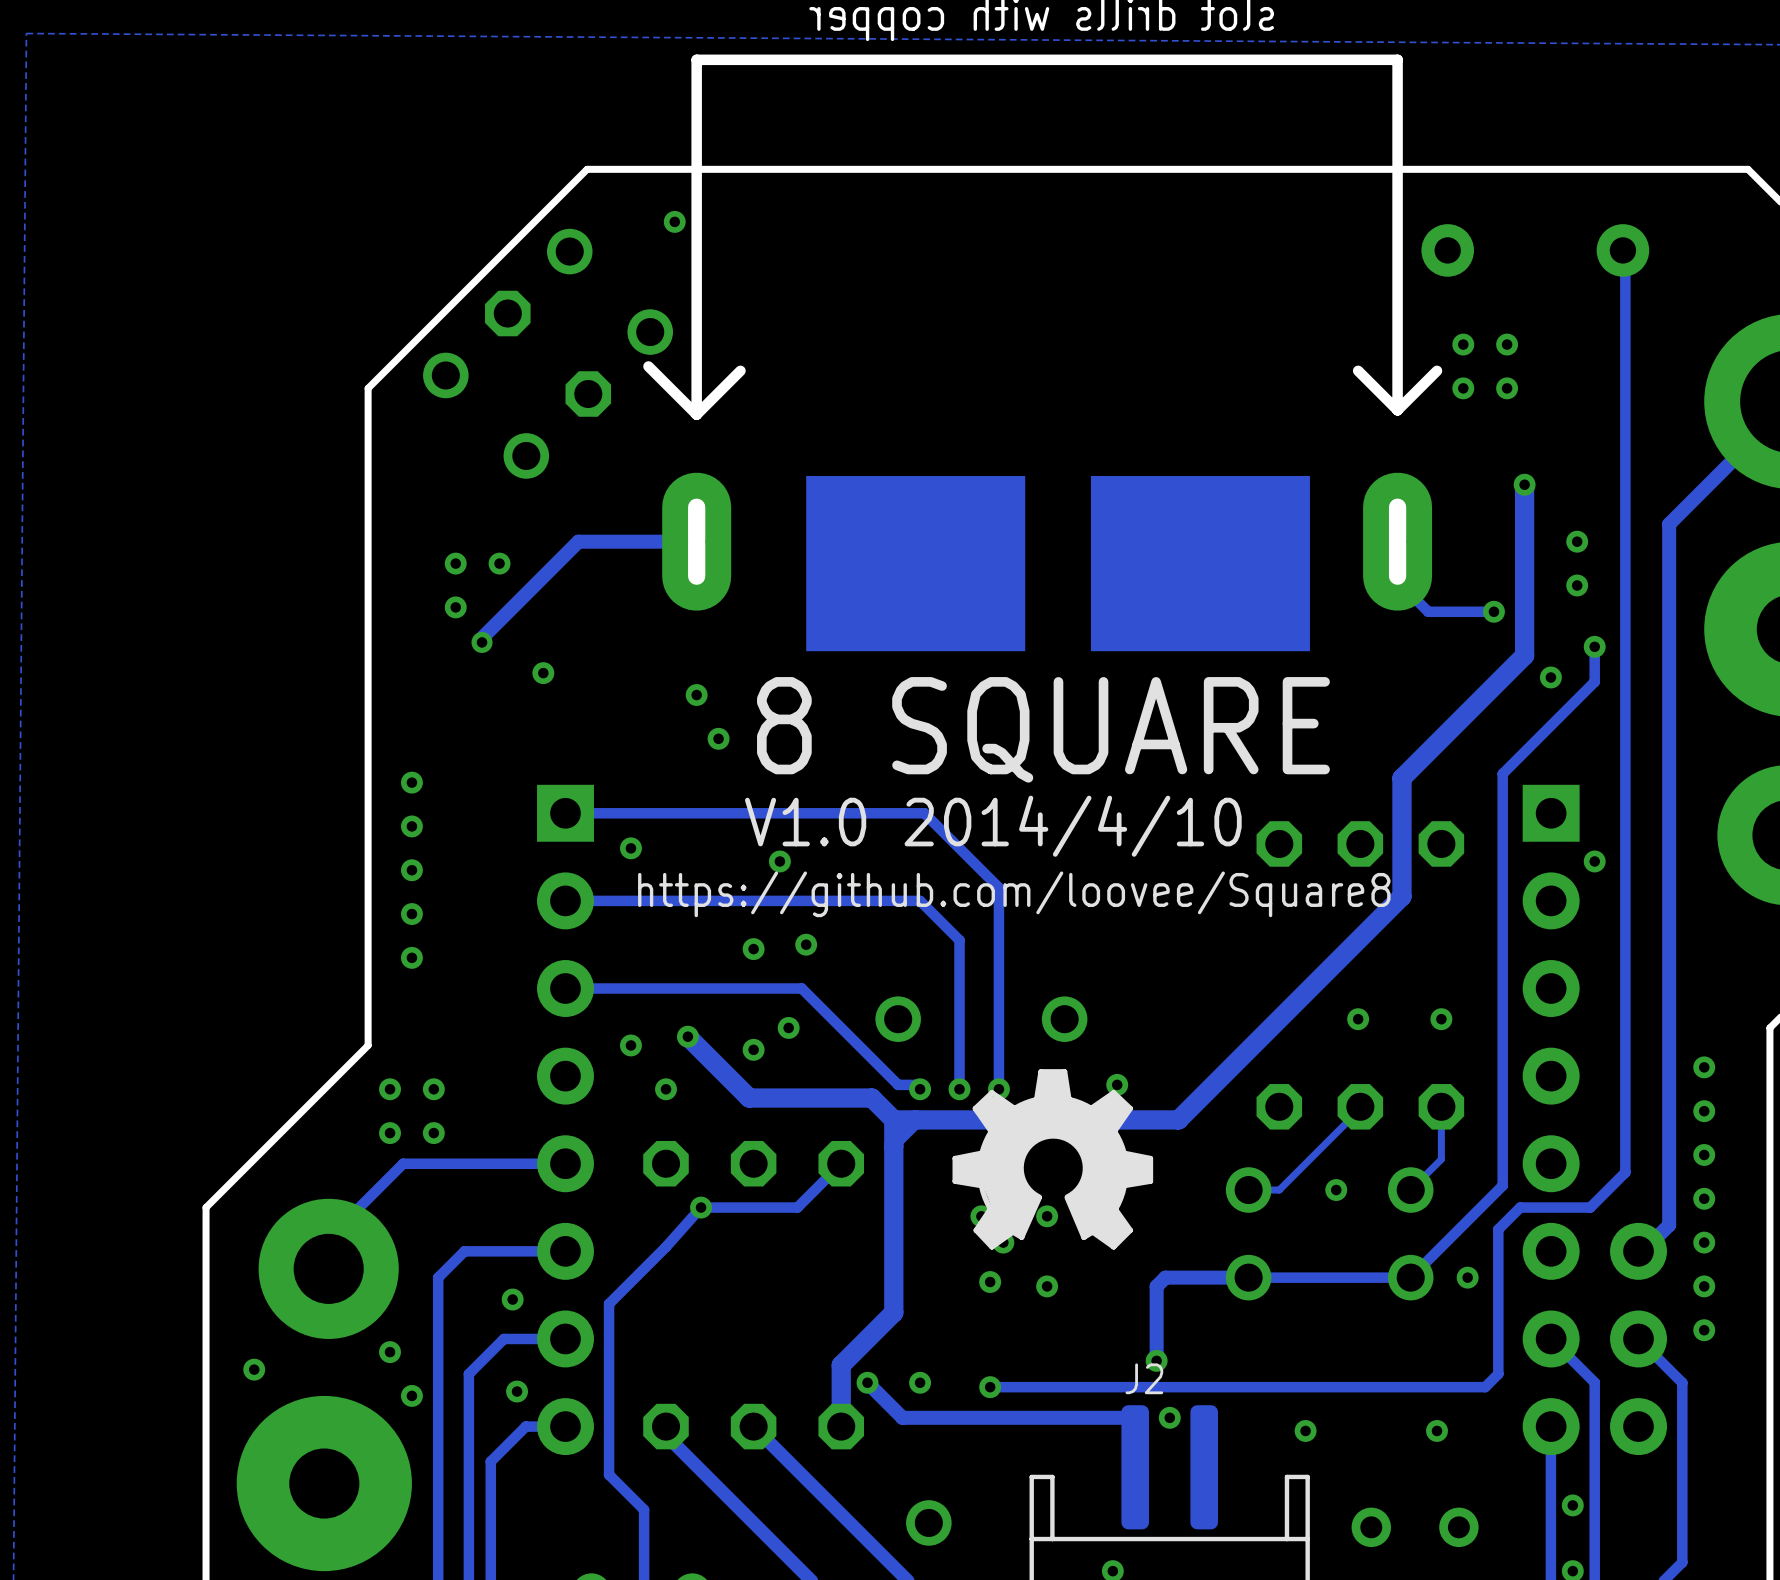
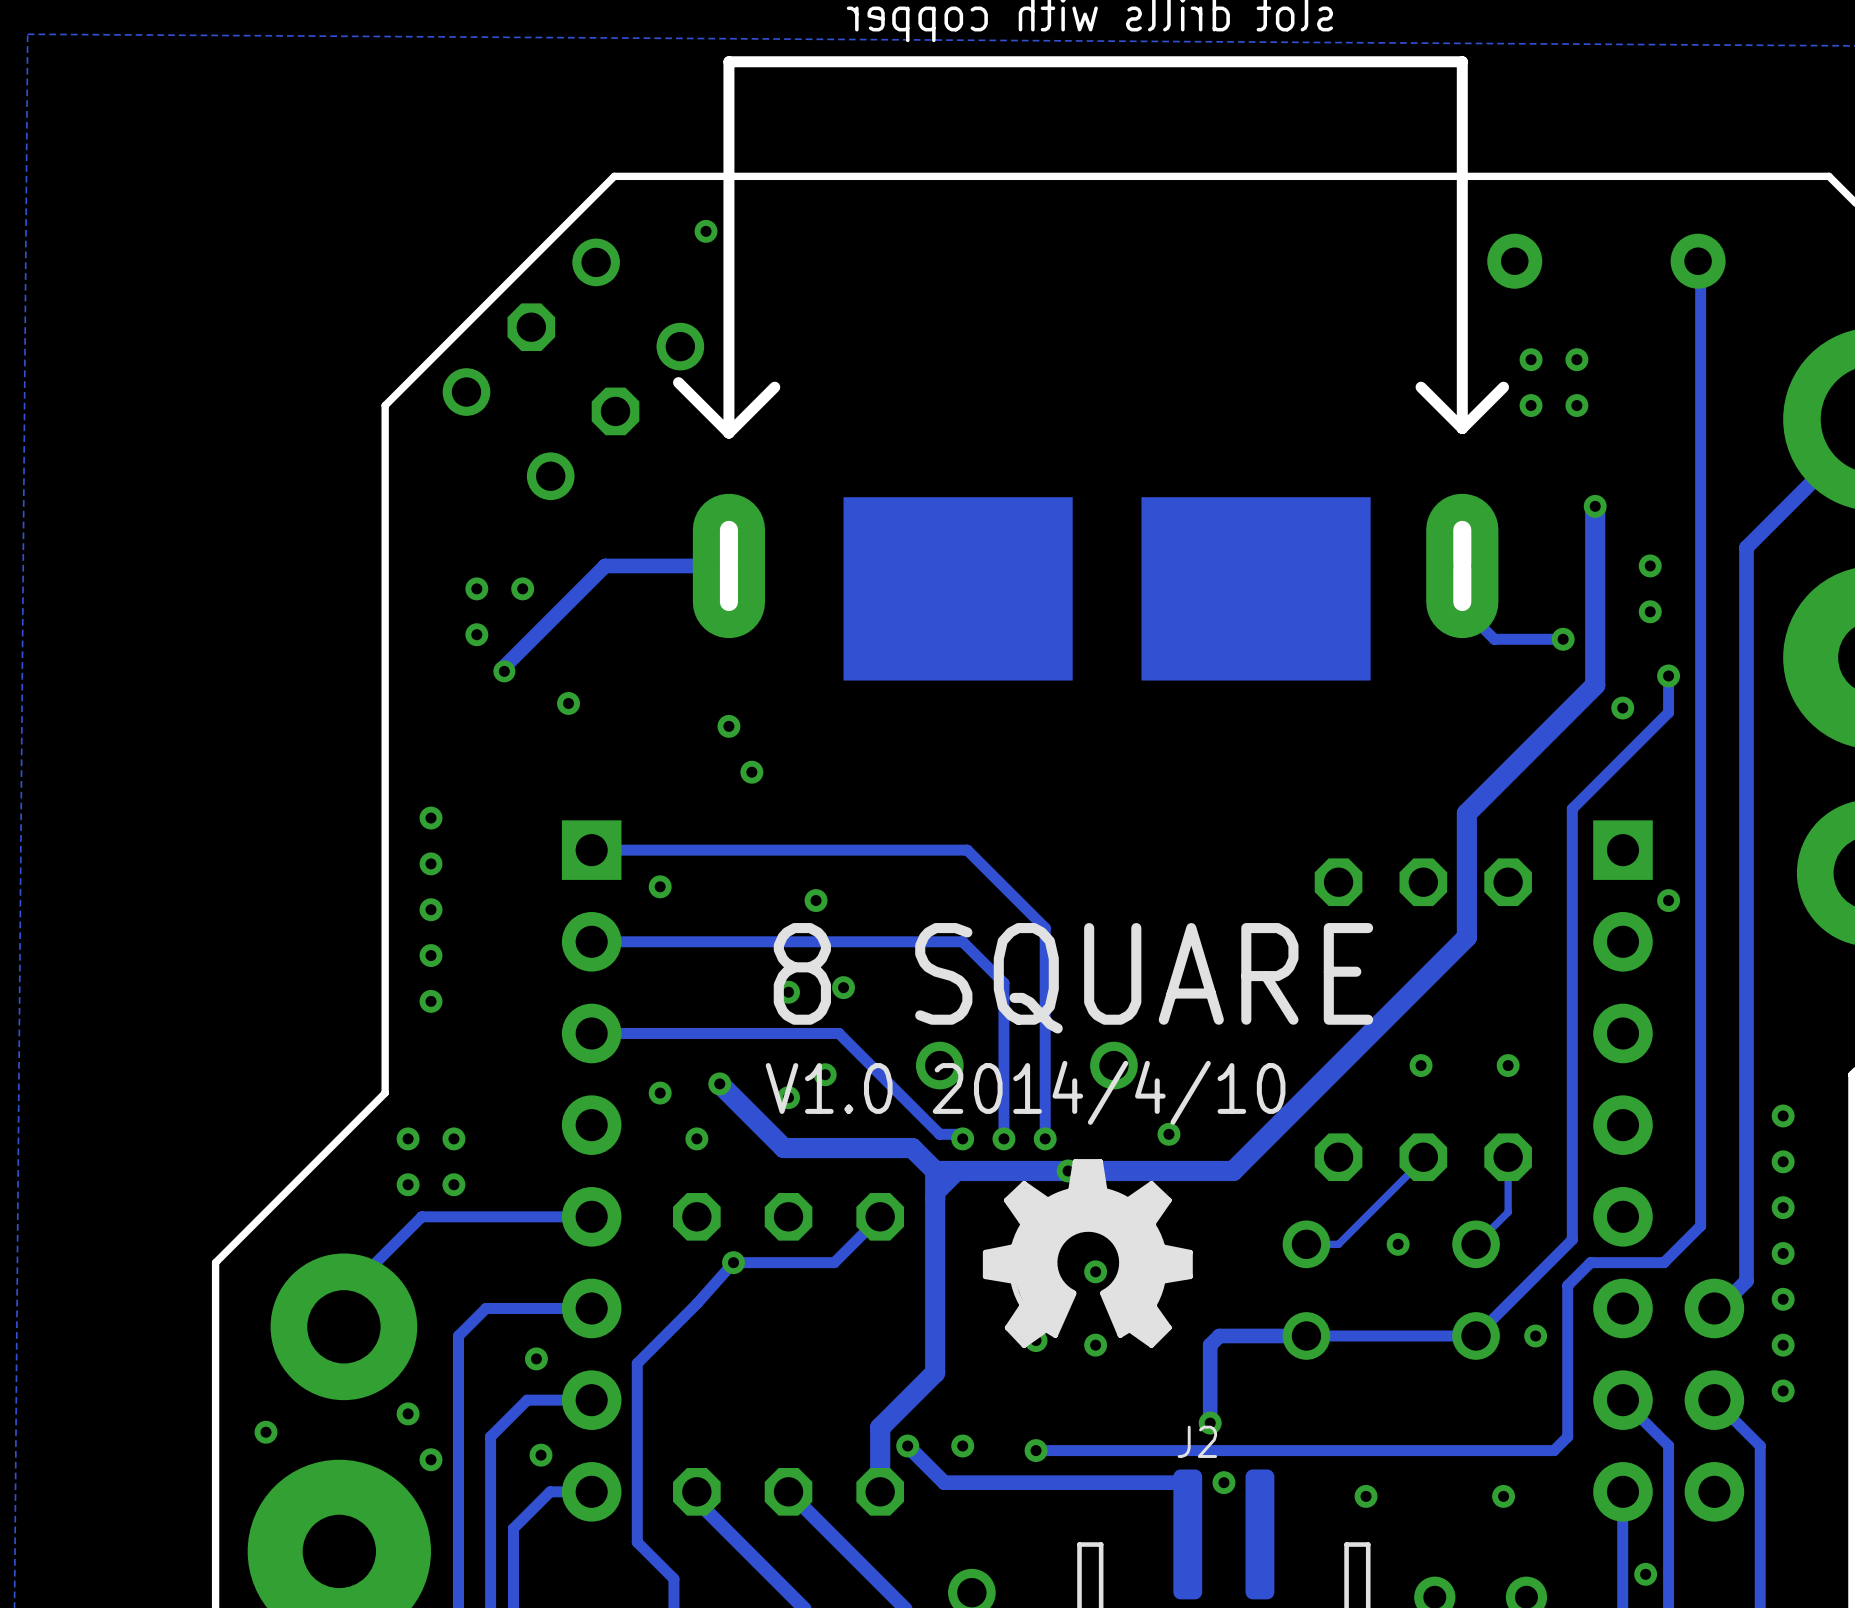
text position: 8 SQUARE (1043, 729) -> 8 SQUARE (1073, 978)
text position: V1.0 2014/4/10 (993, 826) -> V1.0 2014/4/10 (1025, 1092)
text: https://github.com/loovee/Square8 (1014, 894) -> none
drawing position: (1052, 1159) -> (1087, 1253)

